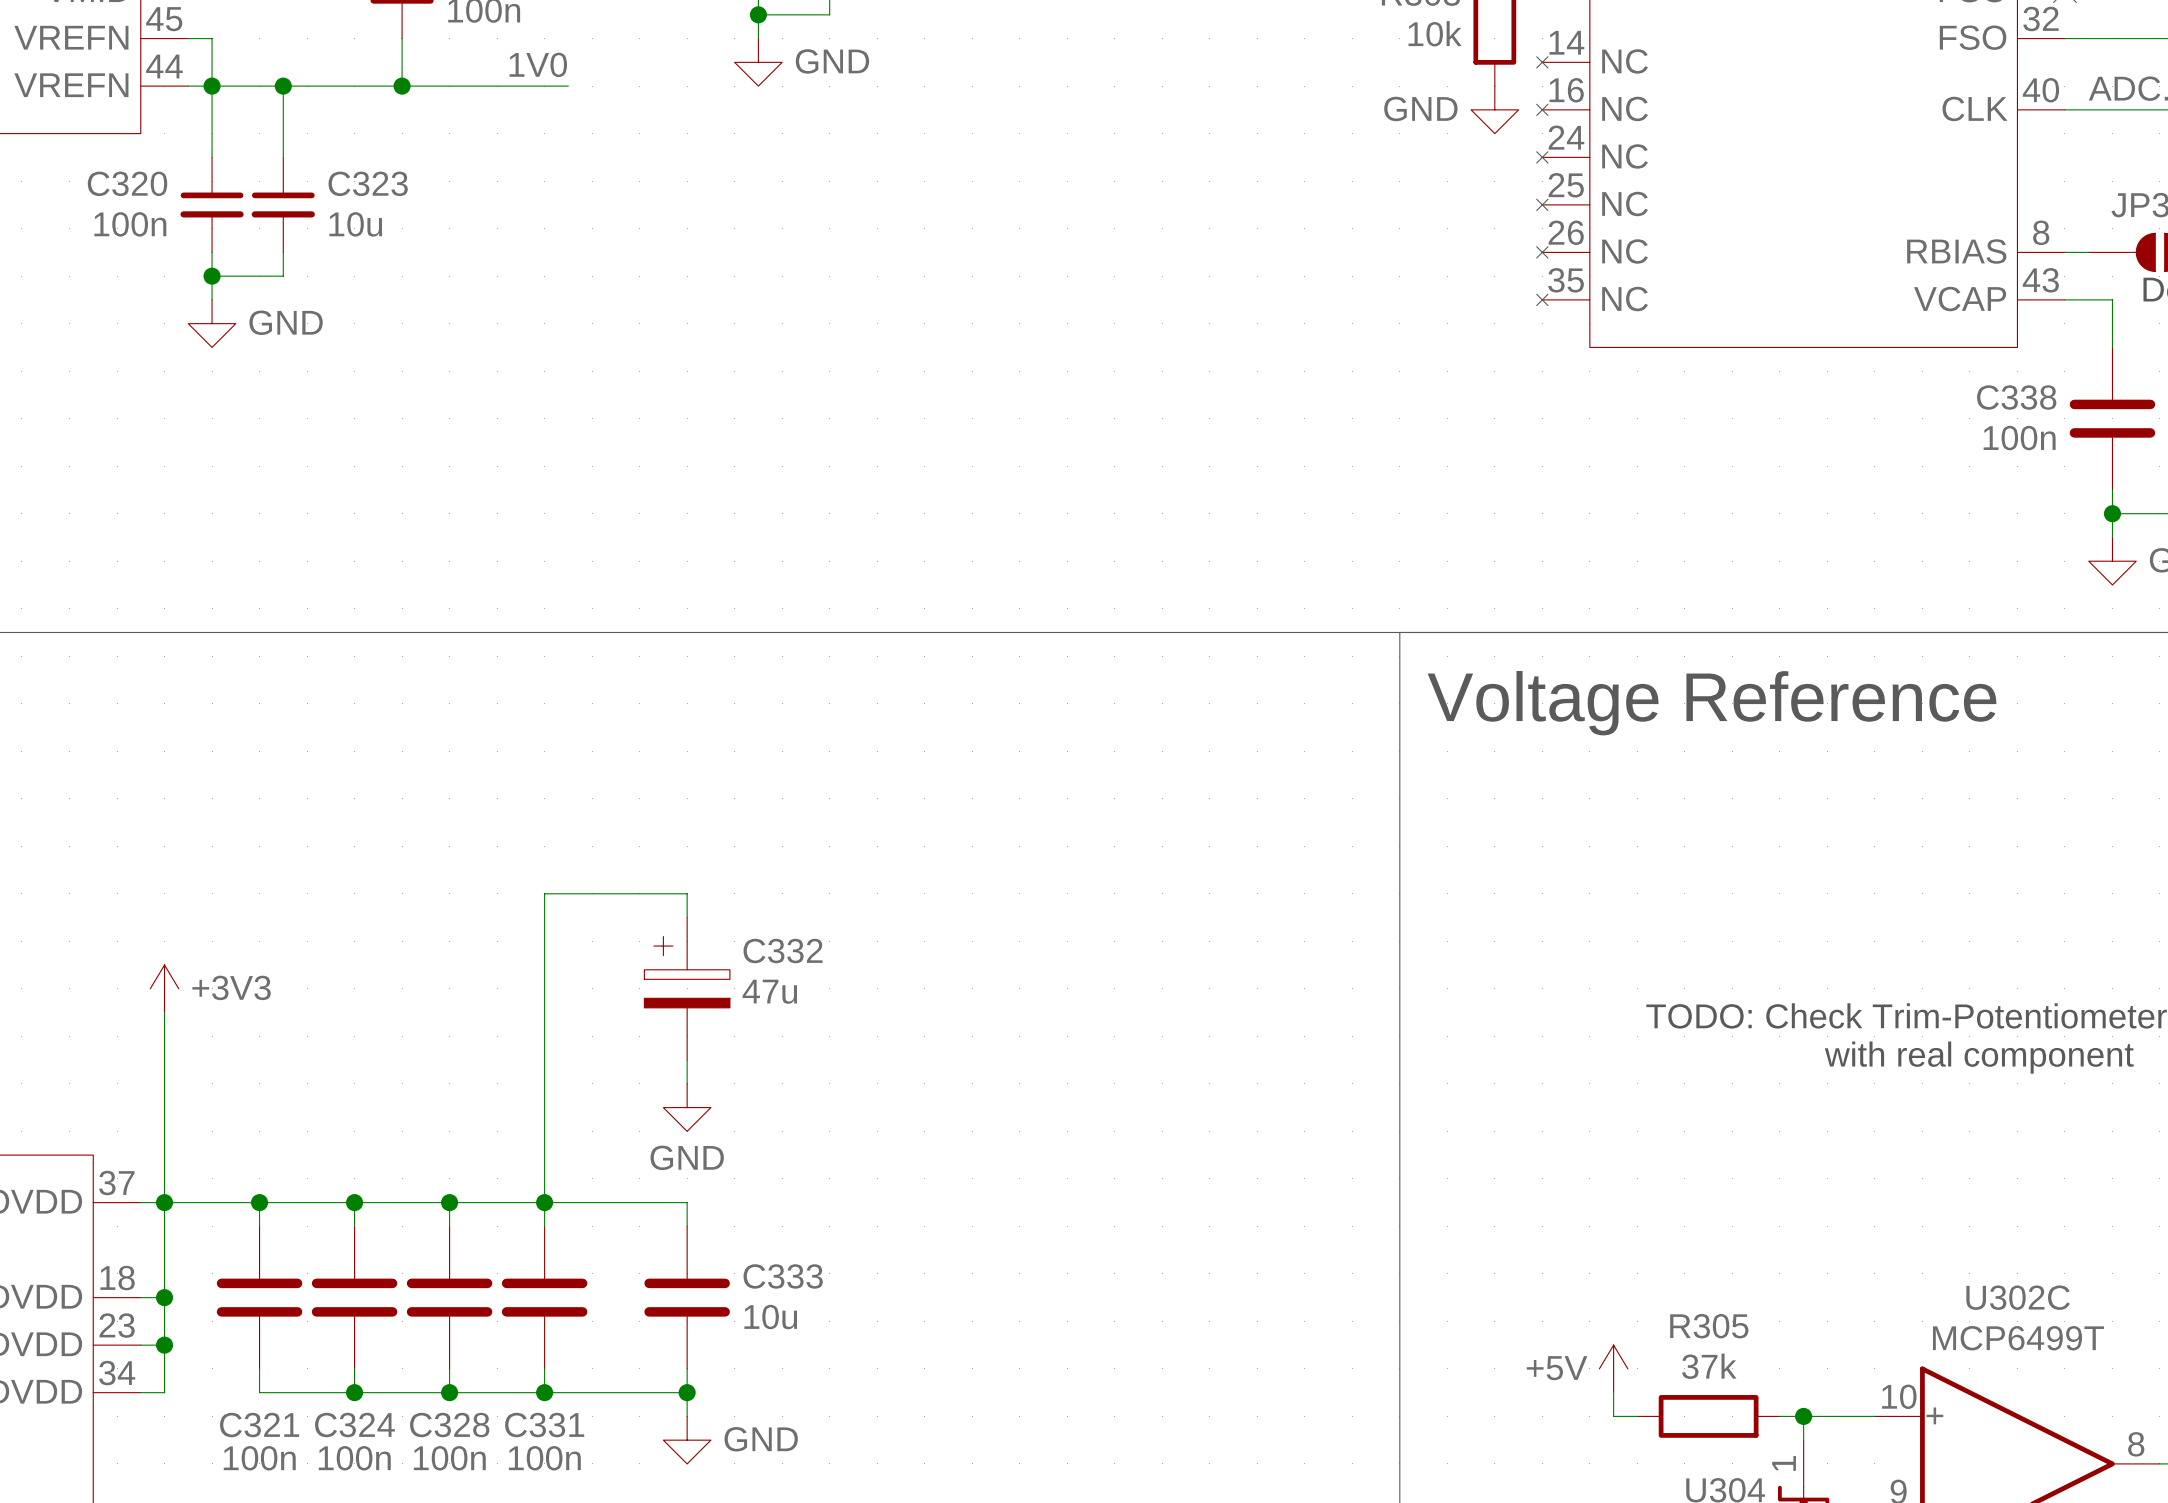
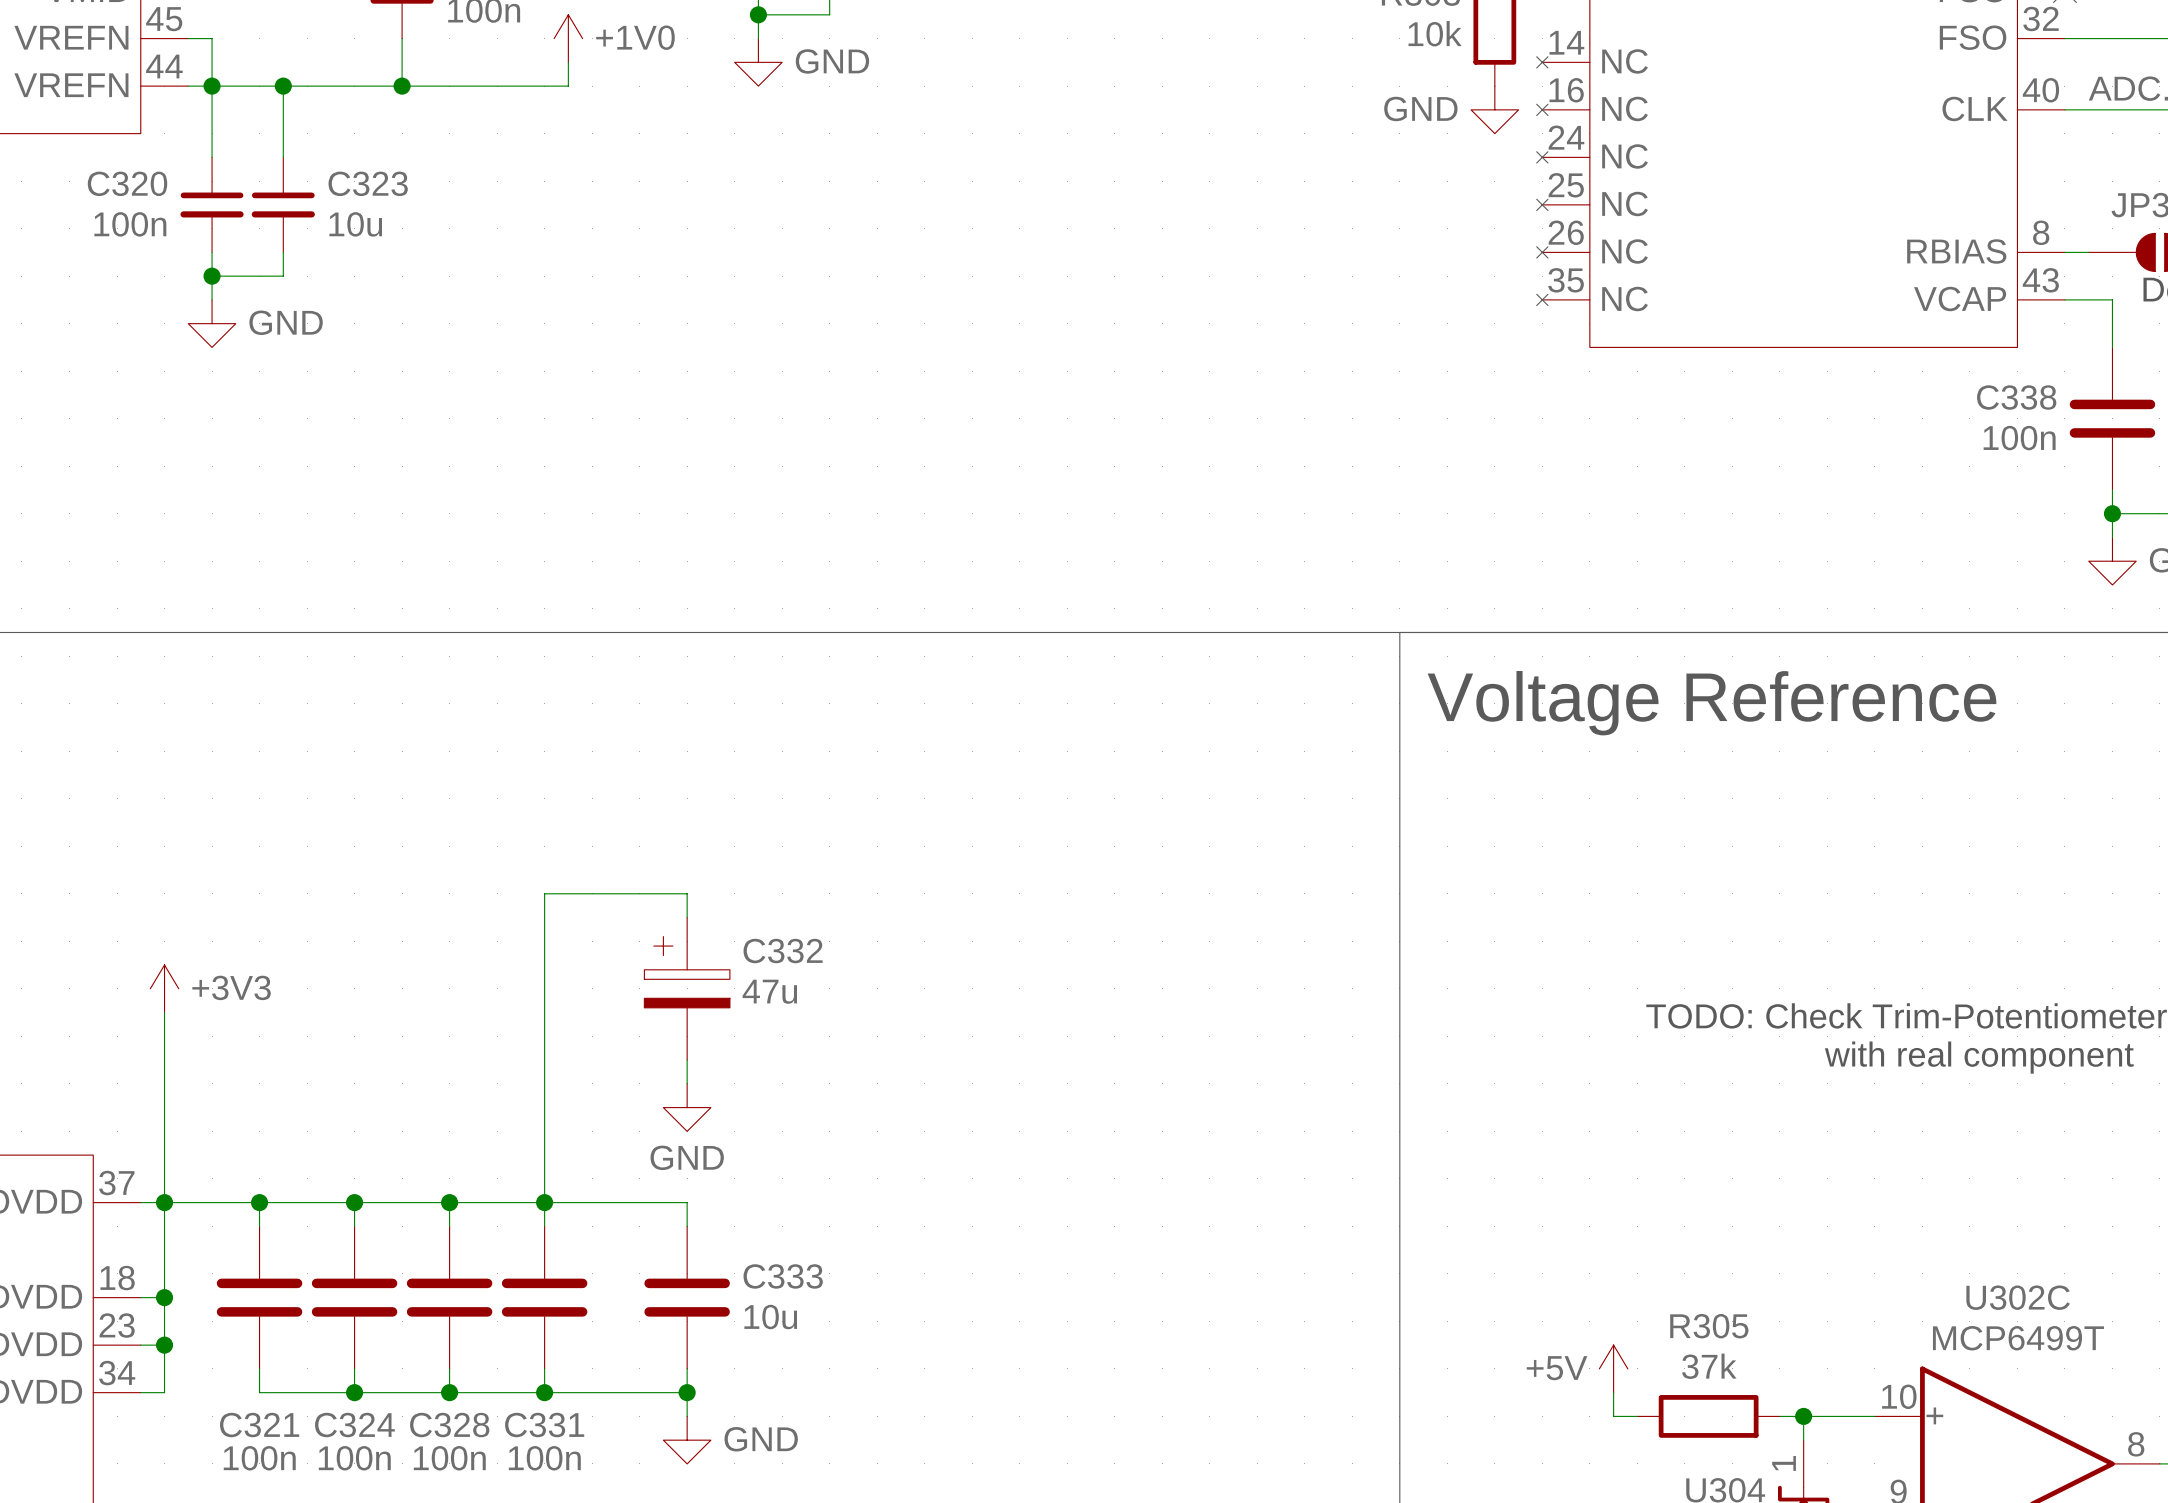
power symbol: none -> +1V0 (568, 38)
wire: none -> (568, 62) (568, 86)
label: 1V0 (538, 64) -> none

